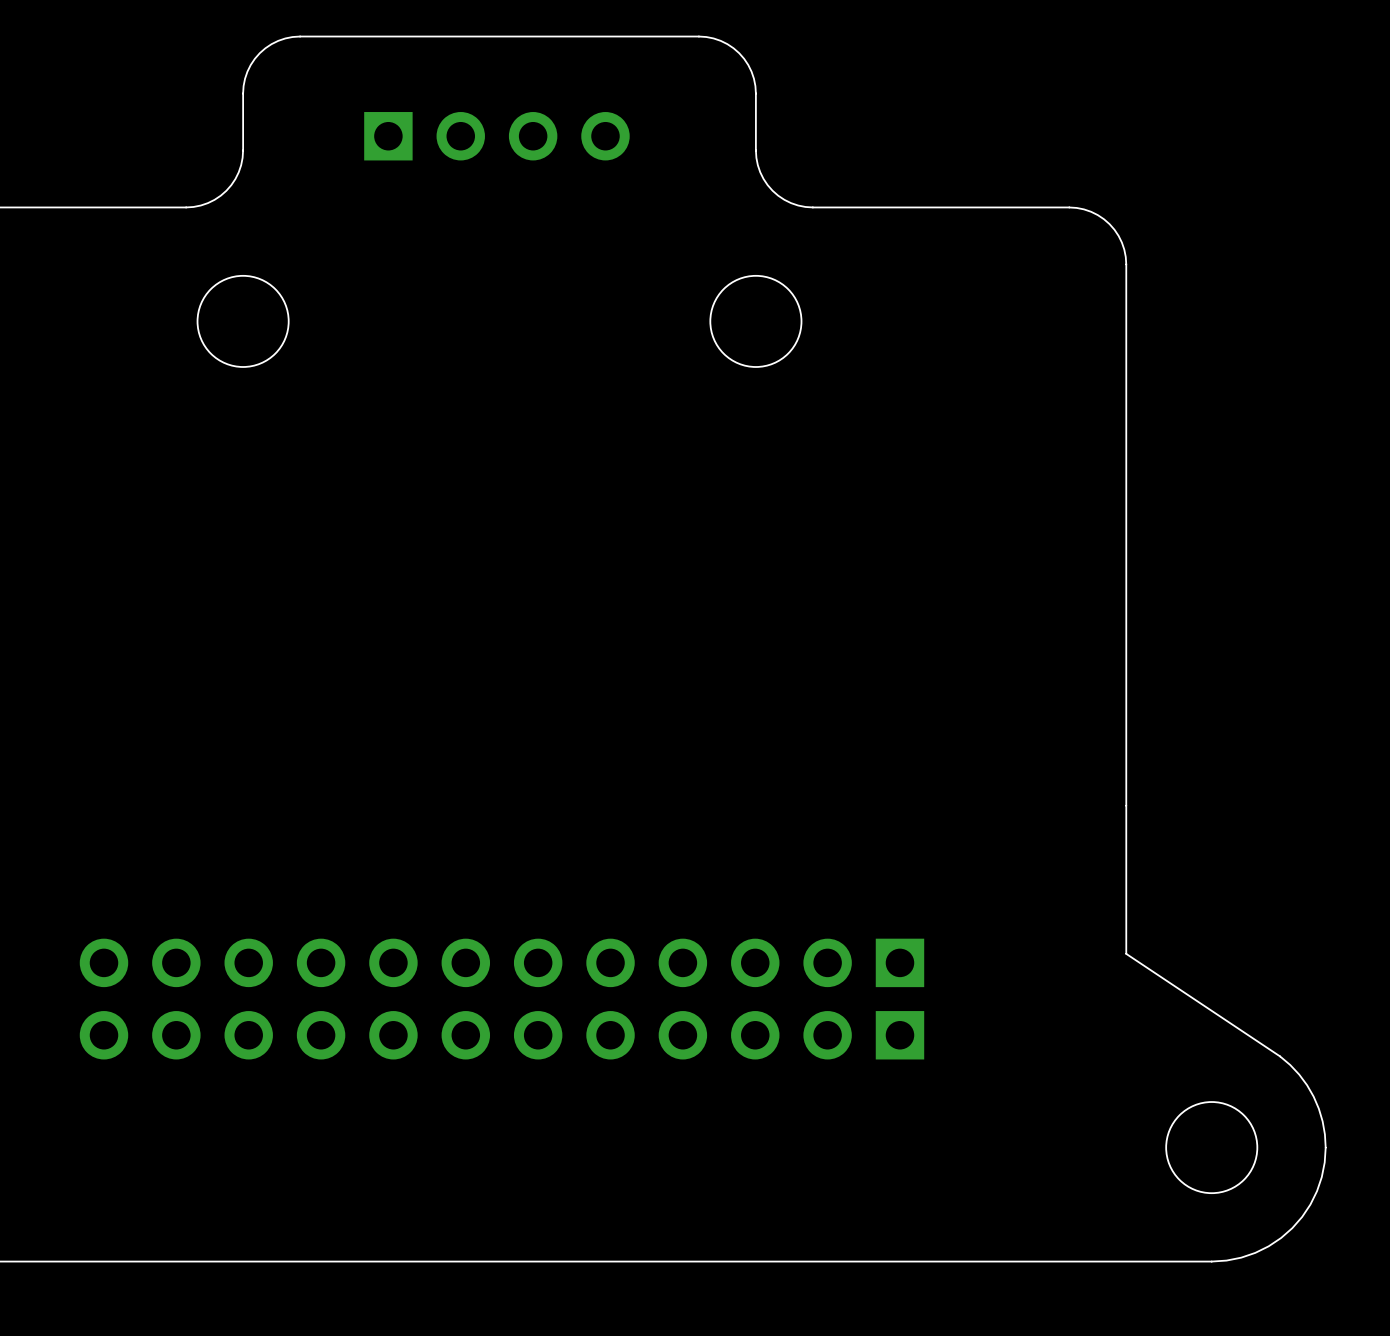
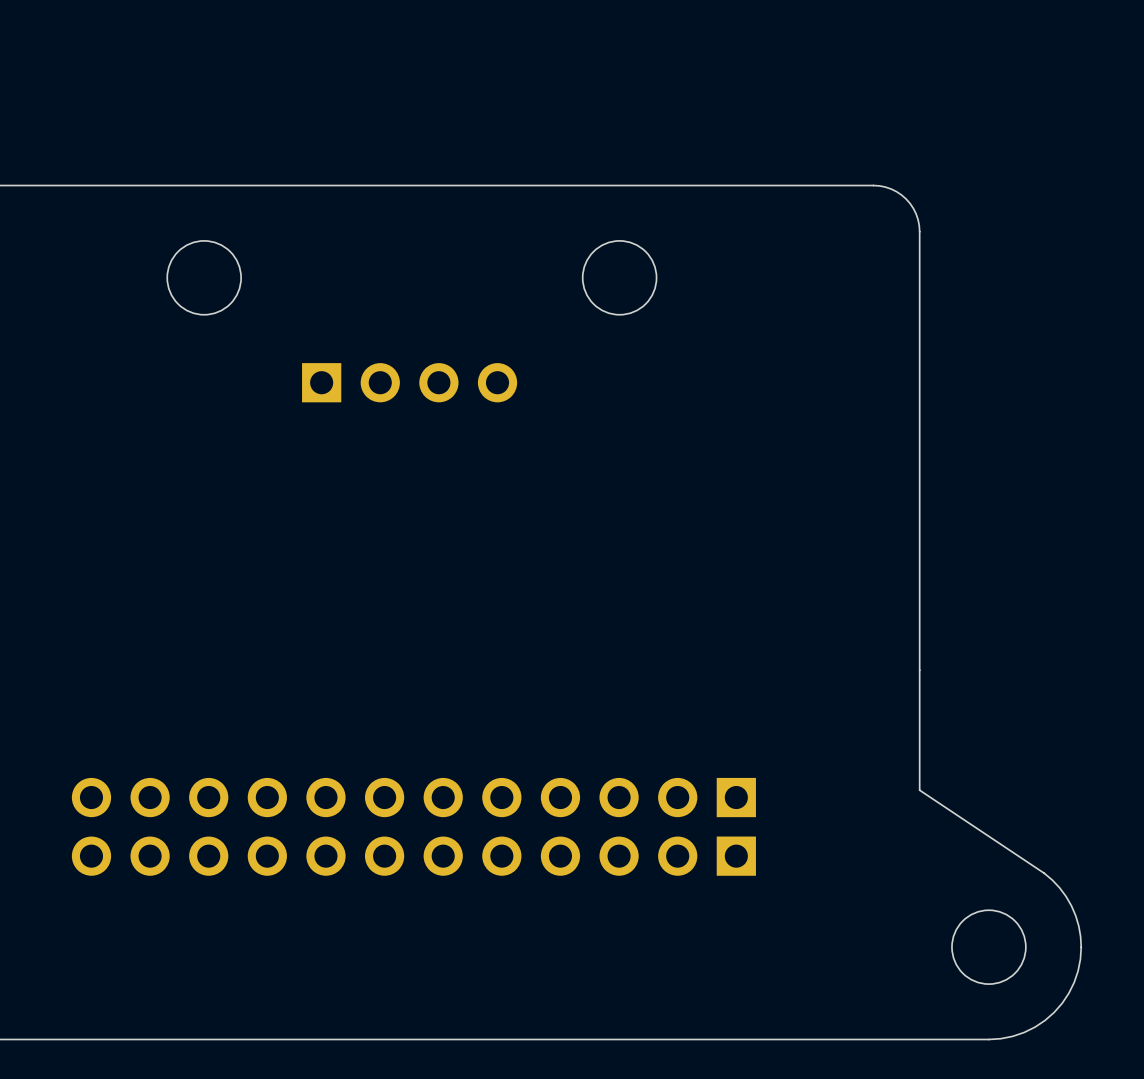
part position: (496, 136) -> (409, 382)
board edge: (812, 207) (798, 205) (784, 199) (772, 190) (763, 178) (756, 157) (755, 93) (751, 71) (739, 53) (727, 44) (713, 38) (698, 36) (300, 36) (285, 38) (265, 48) (254, 58) (247, 71) (243, 93) (242, 157) (235, 178) (226, 190) (214, 199) (200, 205) (186, 207) -> (665, 185) (158, 185)

